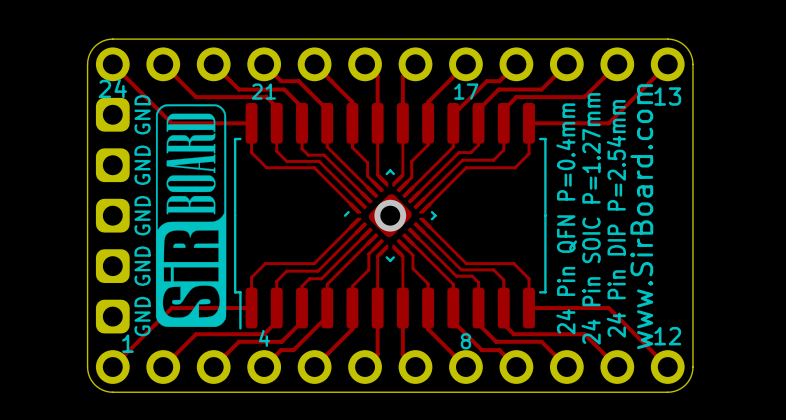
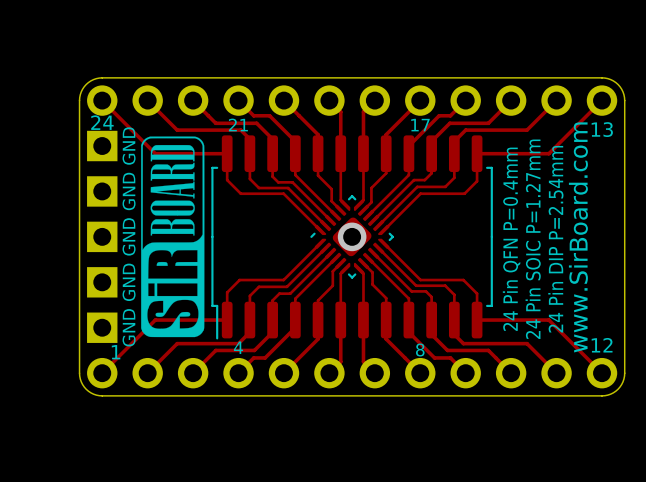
part footprint: [95, 97, 130, 334] -> [87, 130, 118, 343]

